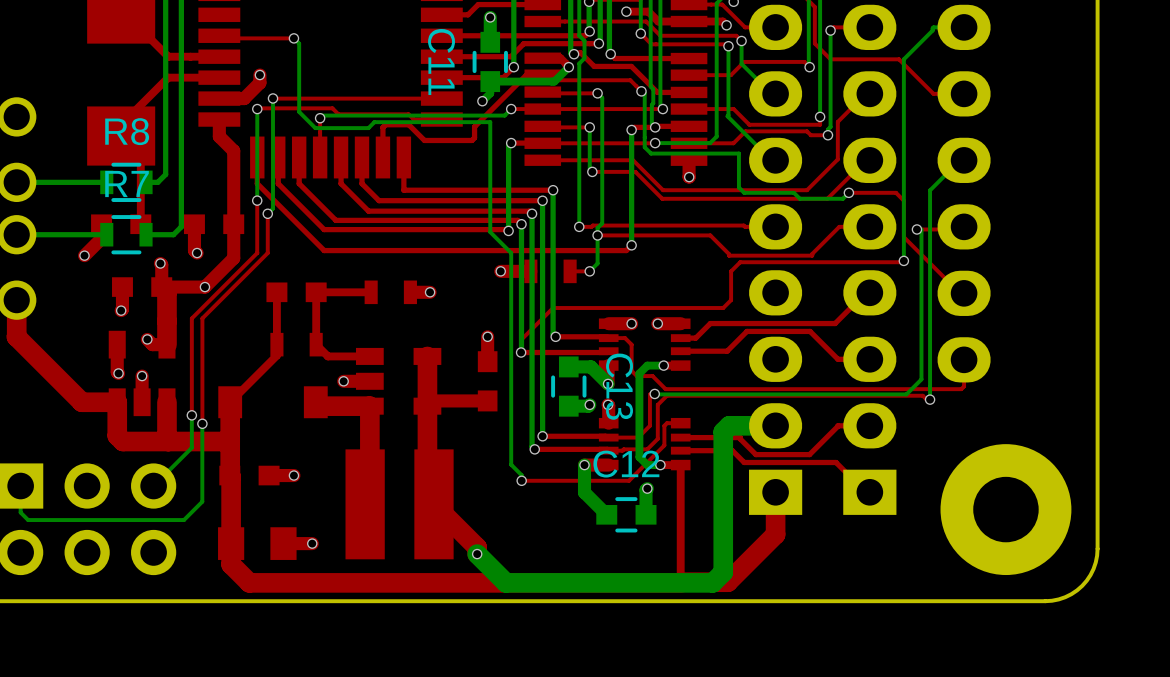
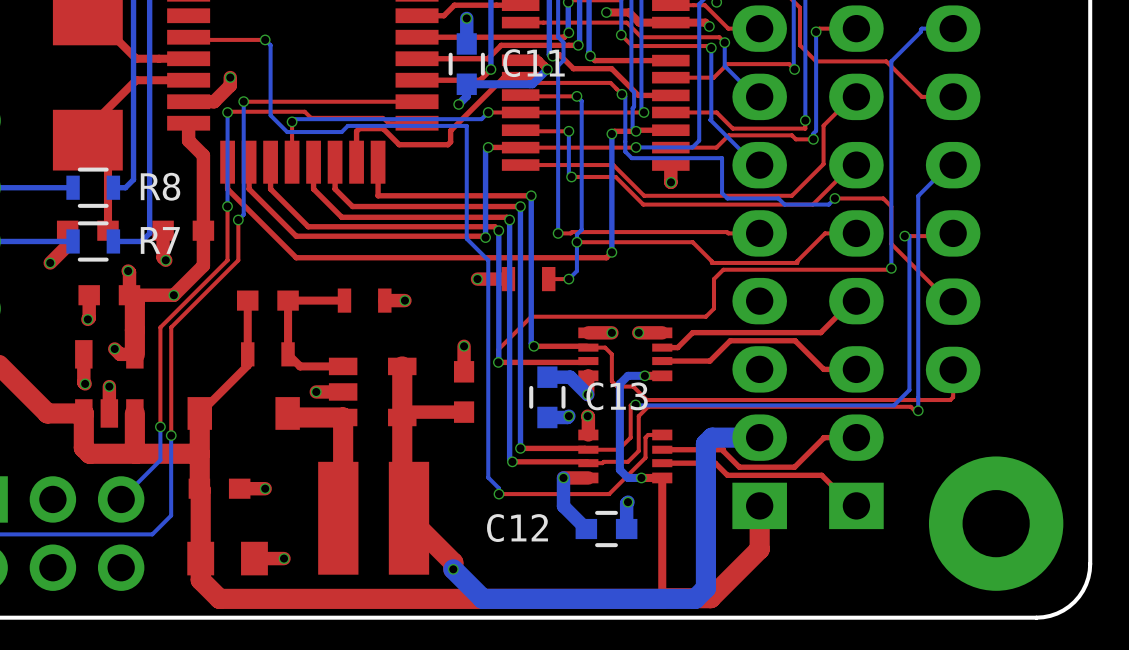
C11 name rotation: 0° (441, 61) -> 90° counterclockwise (533, 63)
C11 name position: C11 (441, 61) -> C11 (533, 63)
R8 name position: R8 (127, 131) -> R8 (160, 186)
R7 name position: R7 (127, 184) -> R7 (160, 240)
C13 name rotation: 0° (619, 386) -> 90° counterclockwise (617, 396)
C12 name position: C12 (626, 464) -> C12 (517, 528)

